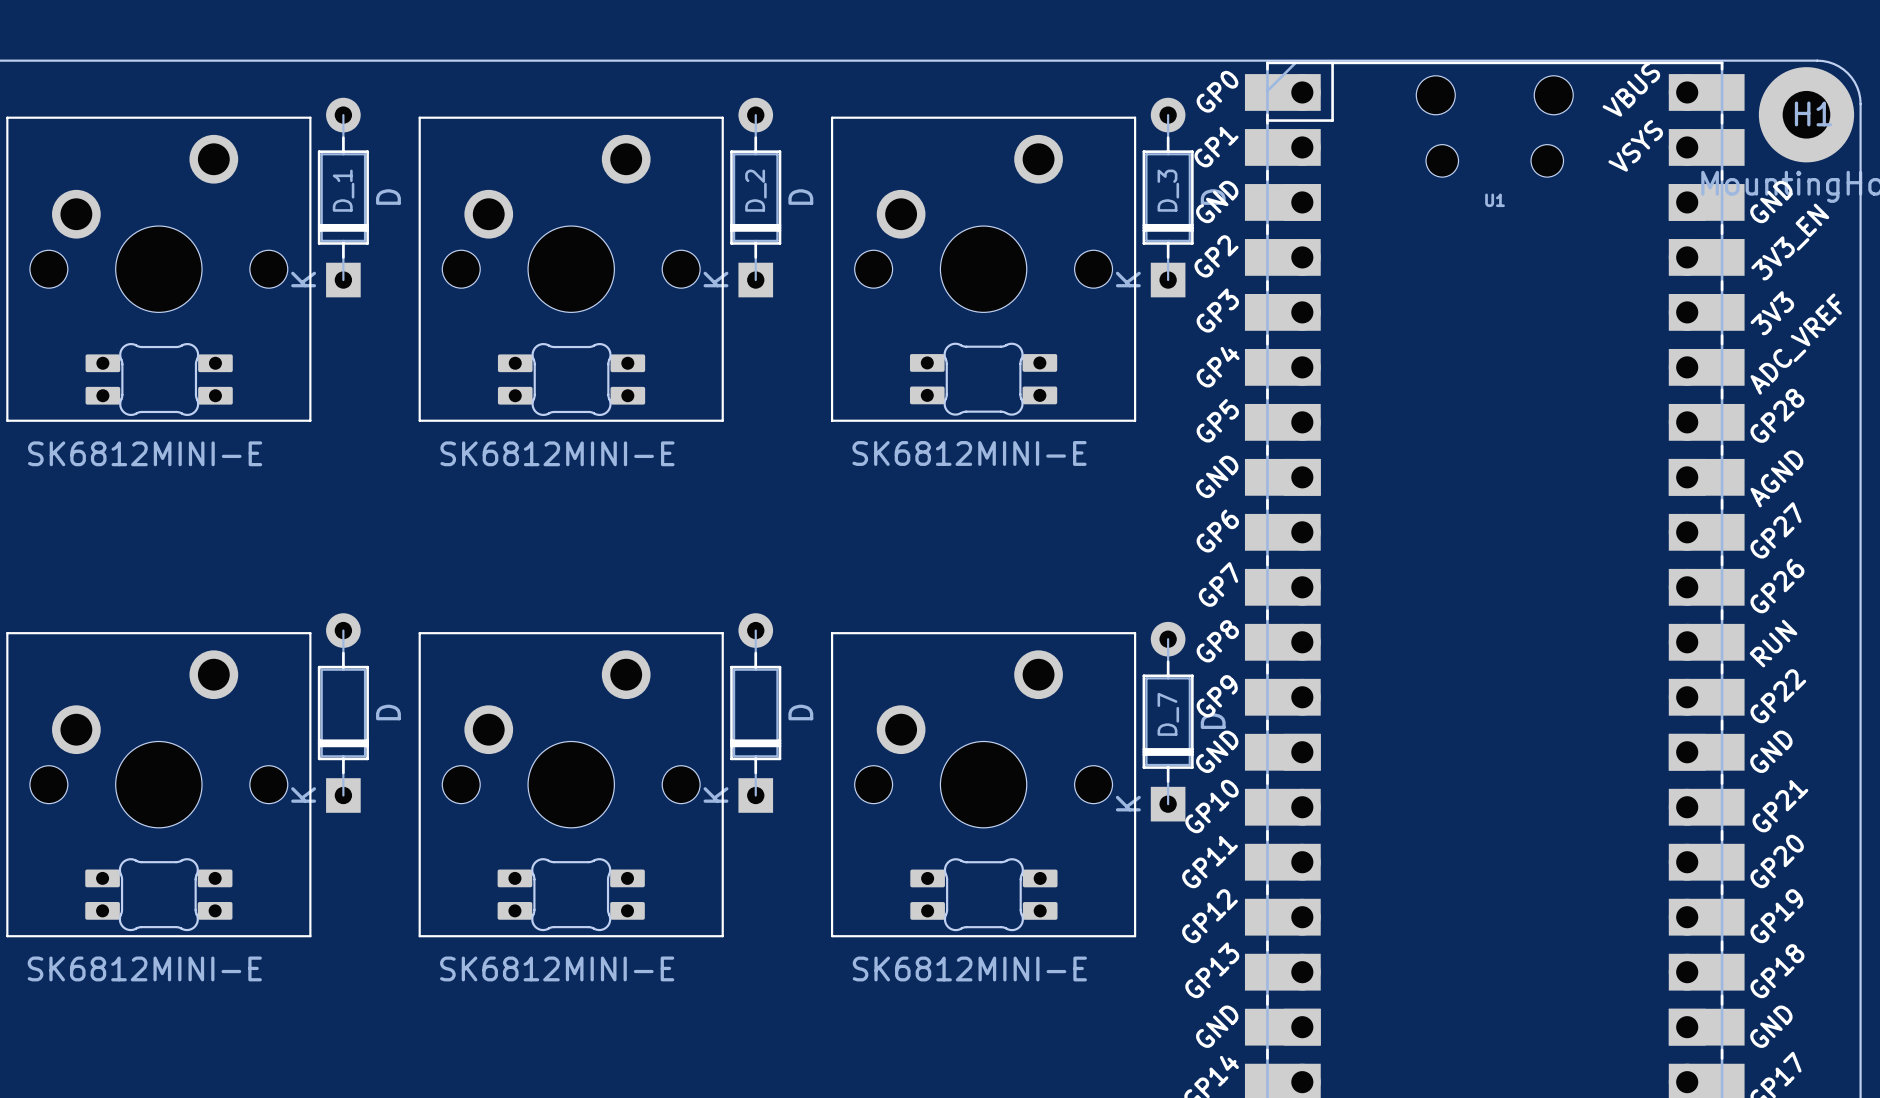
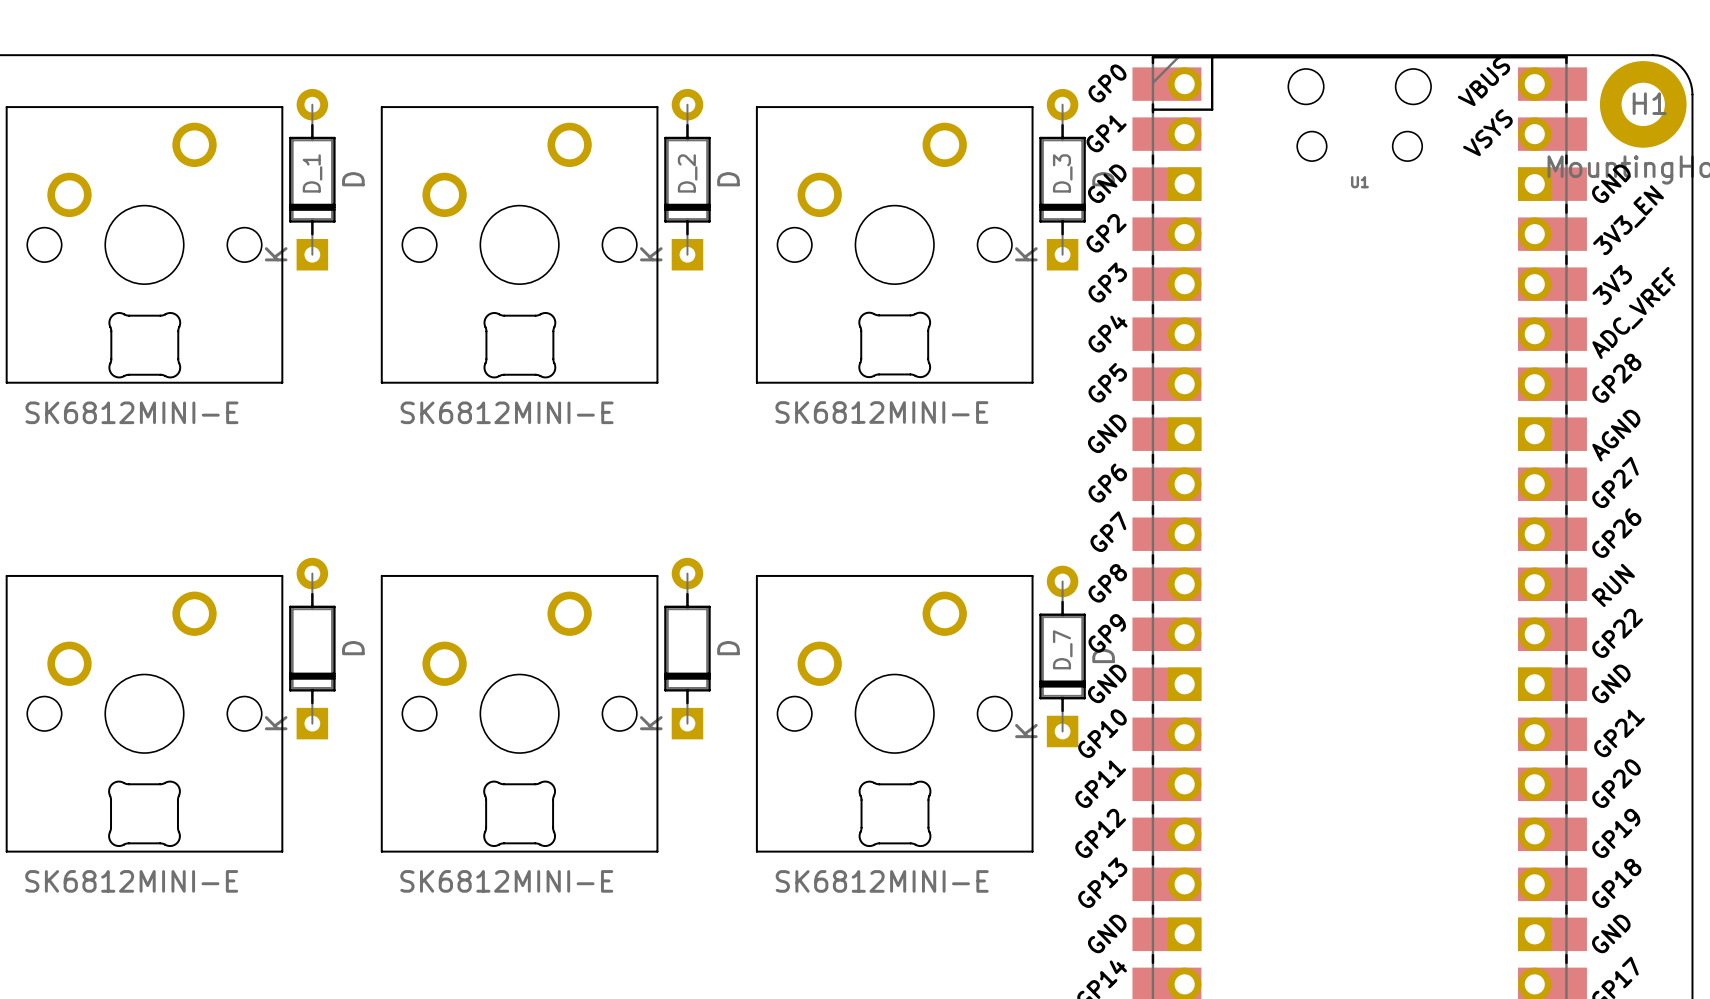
part footprint: [85, 342, 233, 417] -> [108, 312, 182, 379]
part footprint: [497, 342, 646, 417] -> [483, 312, 557, 379]
part footprint: [909, 342, 1058, 416] -> [858, 311, 932, 379]
part footprint: [85, 858, 233, 932] -> [108, 780, 181, 848]
part footprint: [497, 858, 645, 932] -> [483, 780, 556, 848]
part footprint: [910, 858, 1058, 932] -> [858, 780, 932, 848]

